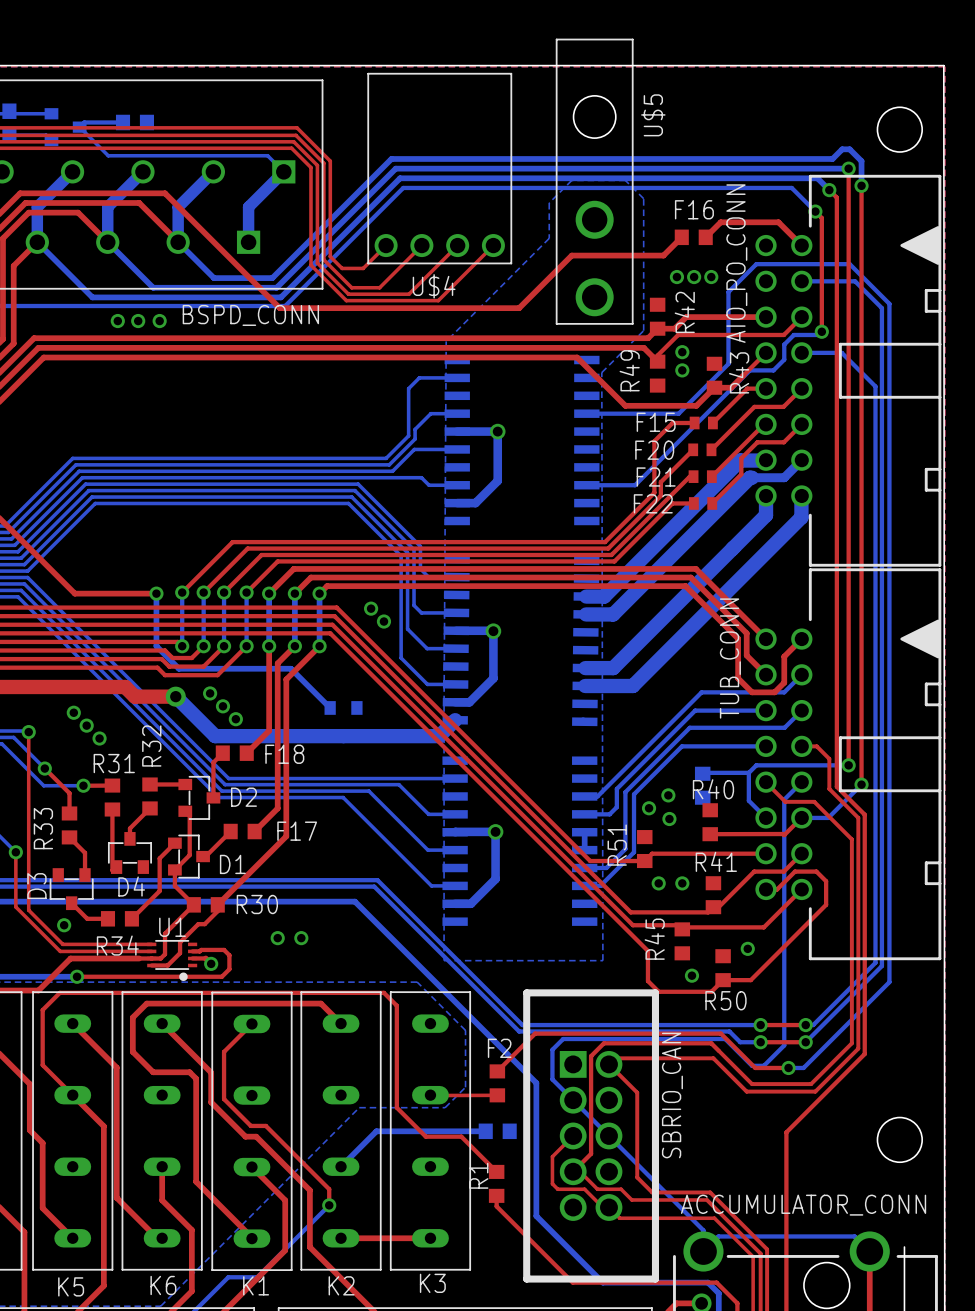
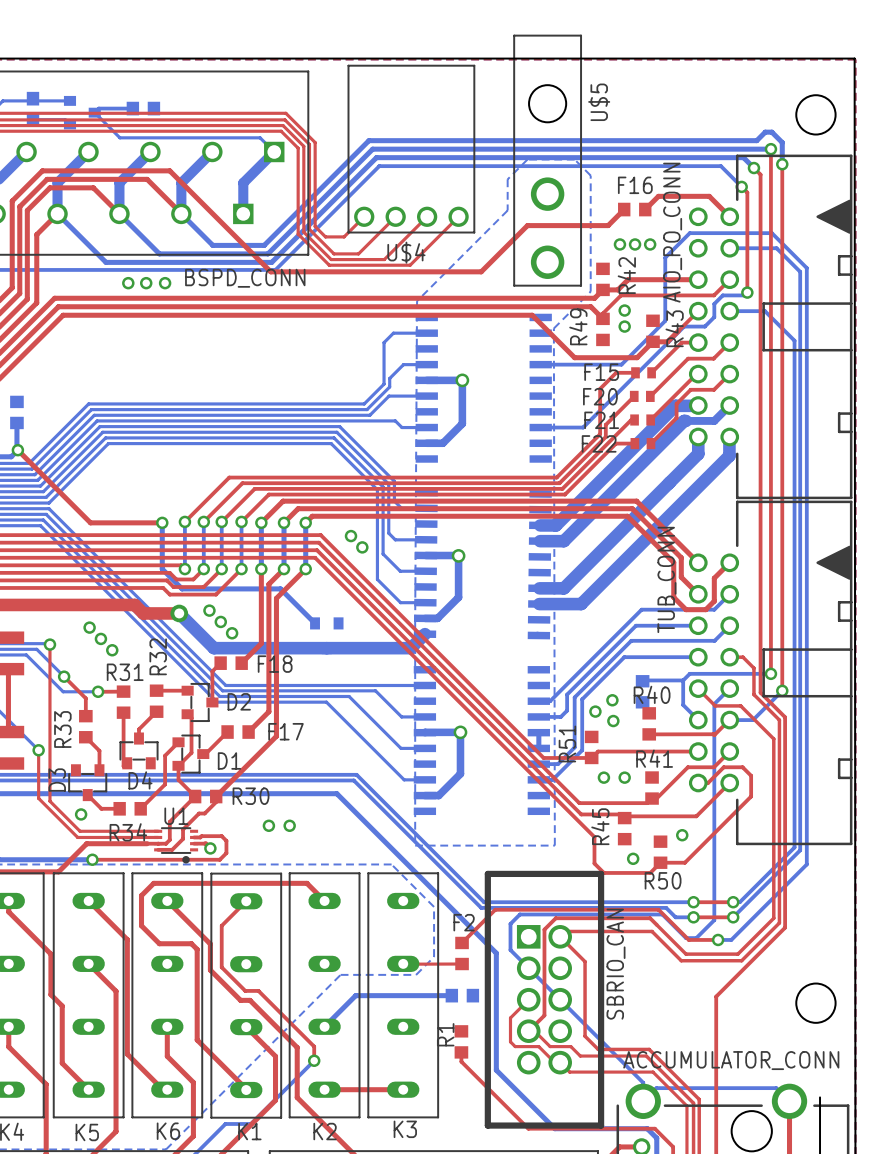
top track: (72, 1095) (42, 1065) (42, 1010) (59, 992) (383, 992) (396, 1005) (396, 1107) (425, 1136) (461, 1136) (496, 1171) -> none

